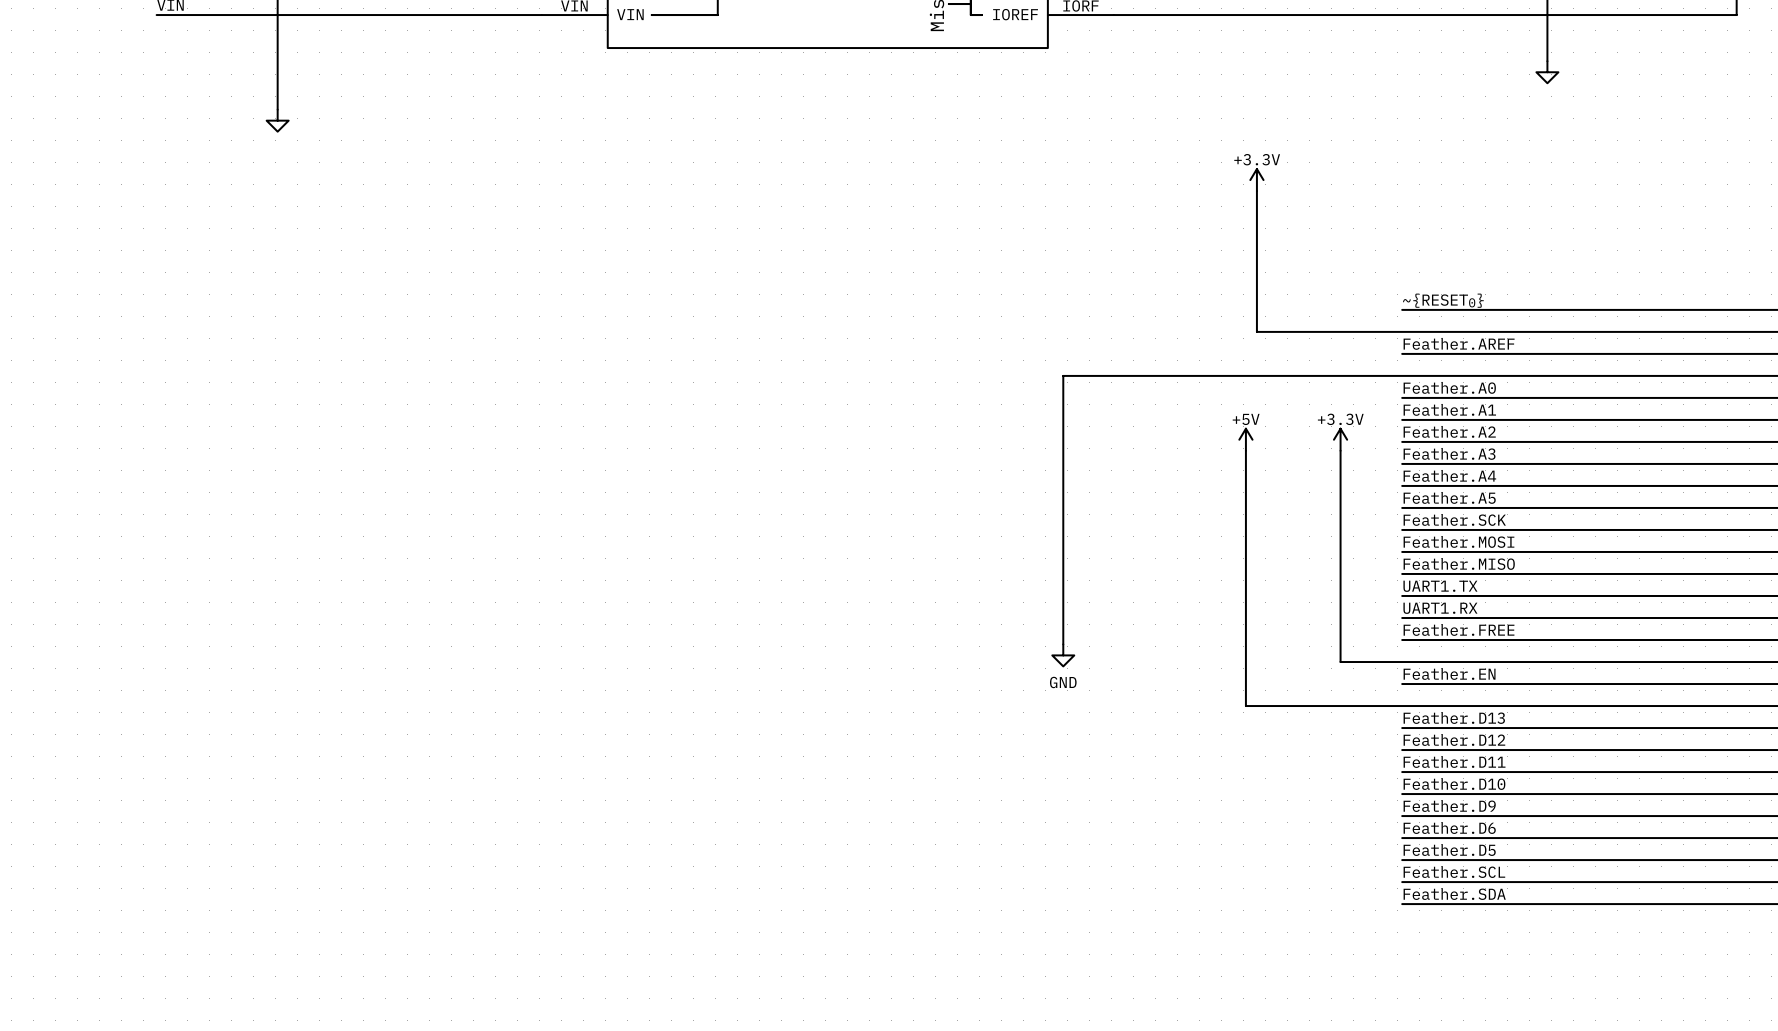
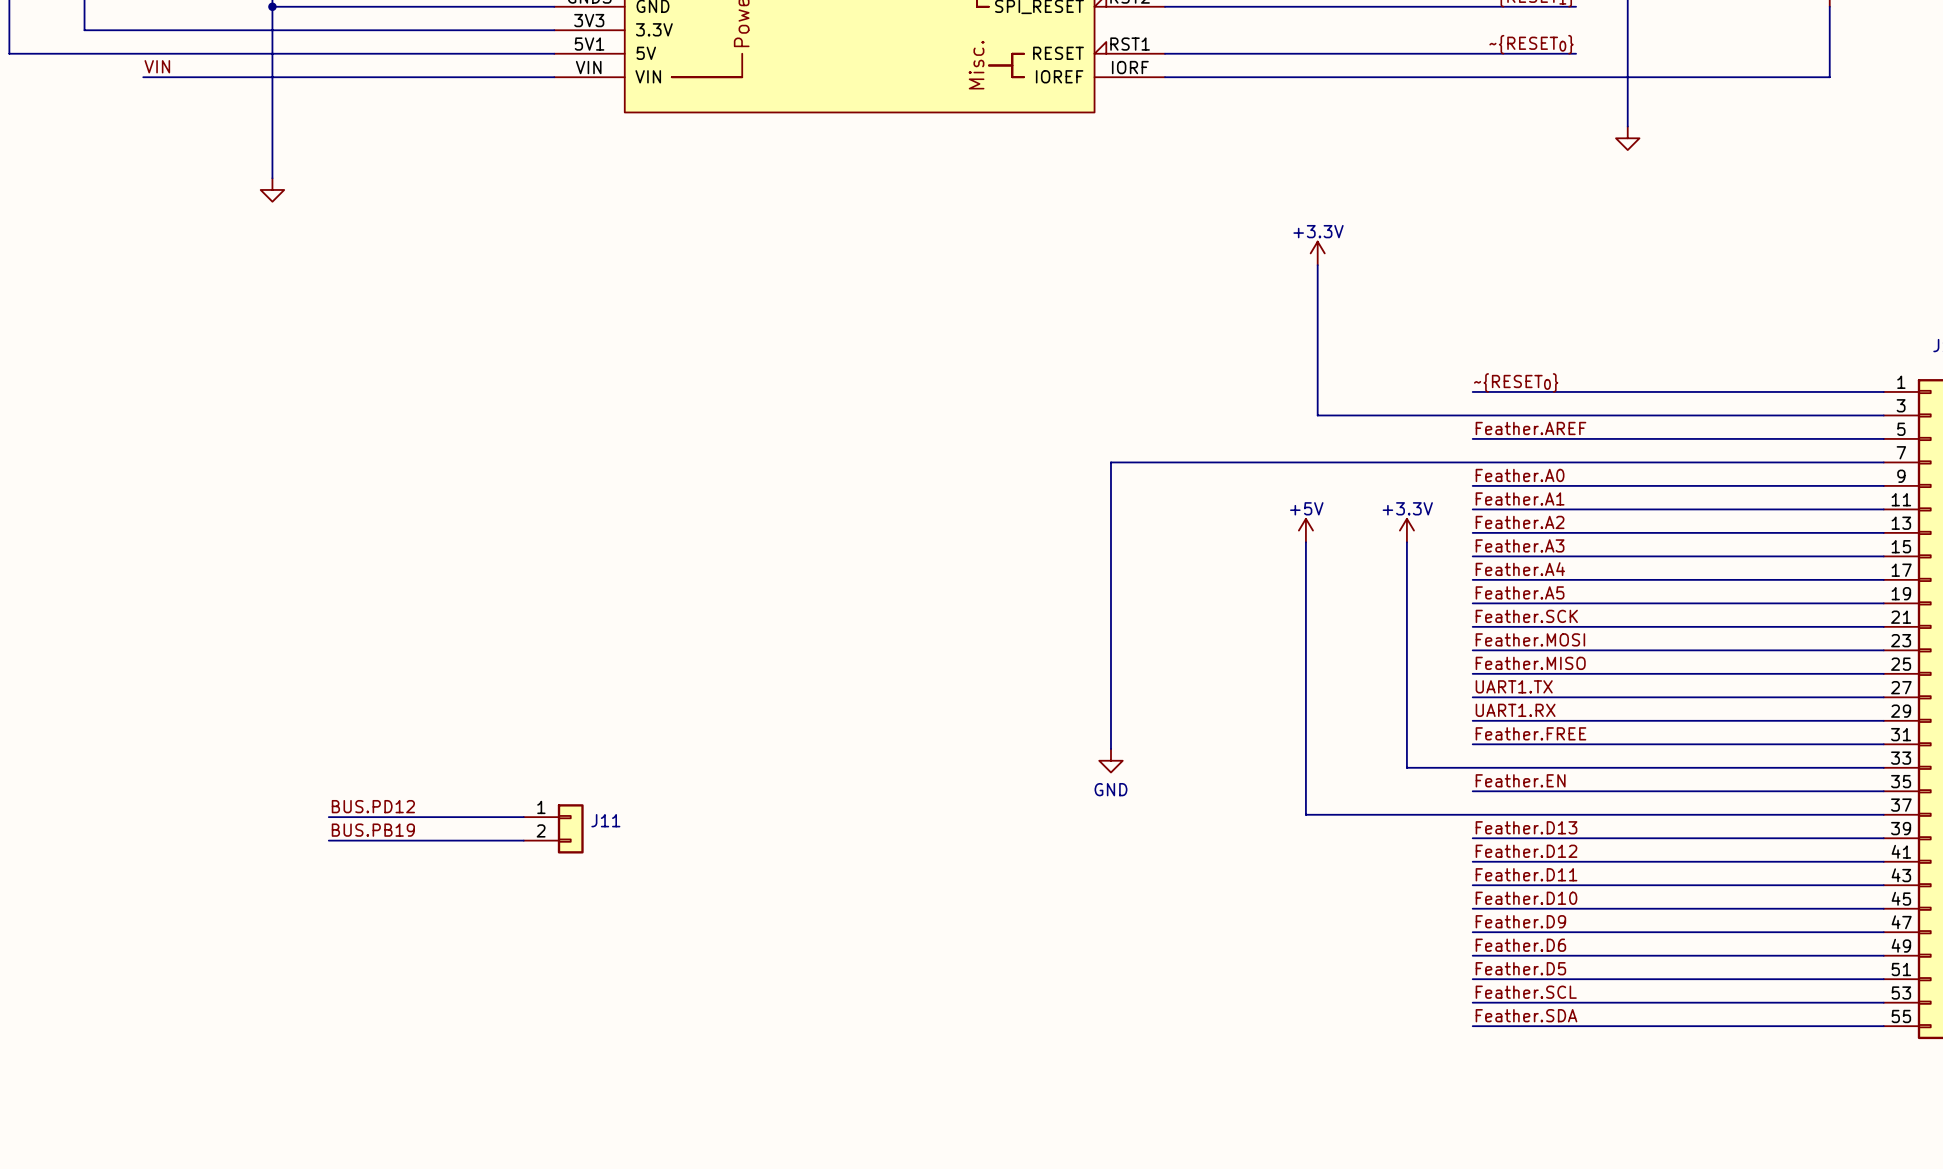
label: none -> BUS.PD12 (373, 806)
wire: none -> (328, 817) (523, 817)
J11: none -> (553, 828)
label: none -> BUS.PB19 (373, 830)
wire: none -> (328, 840) (523, 840)

